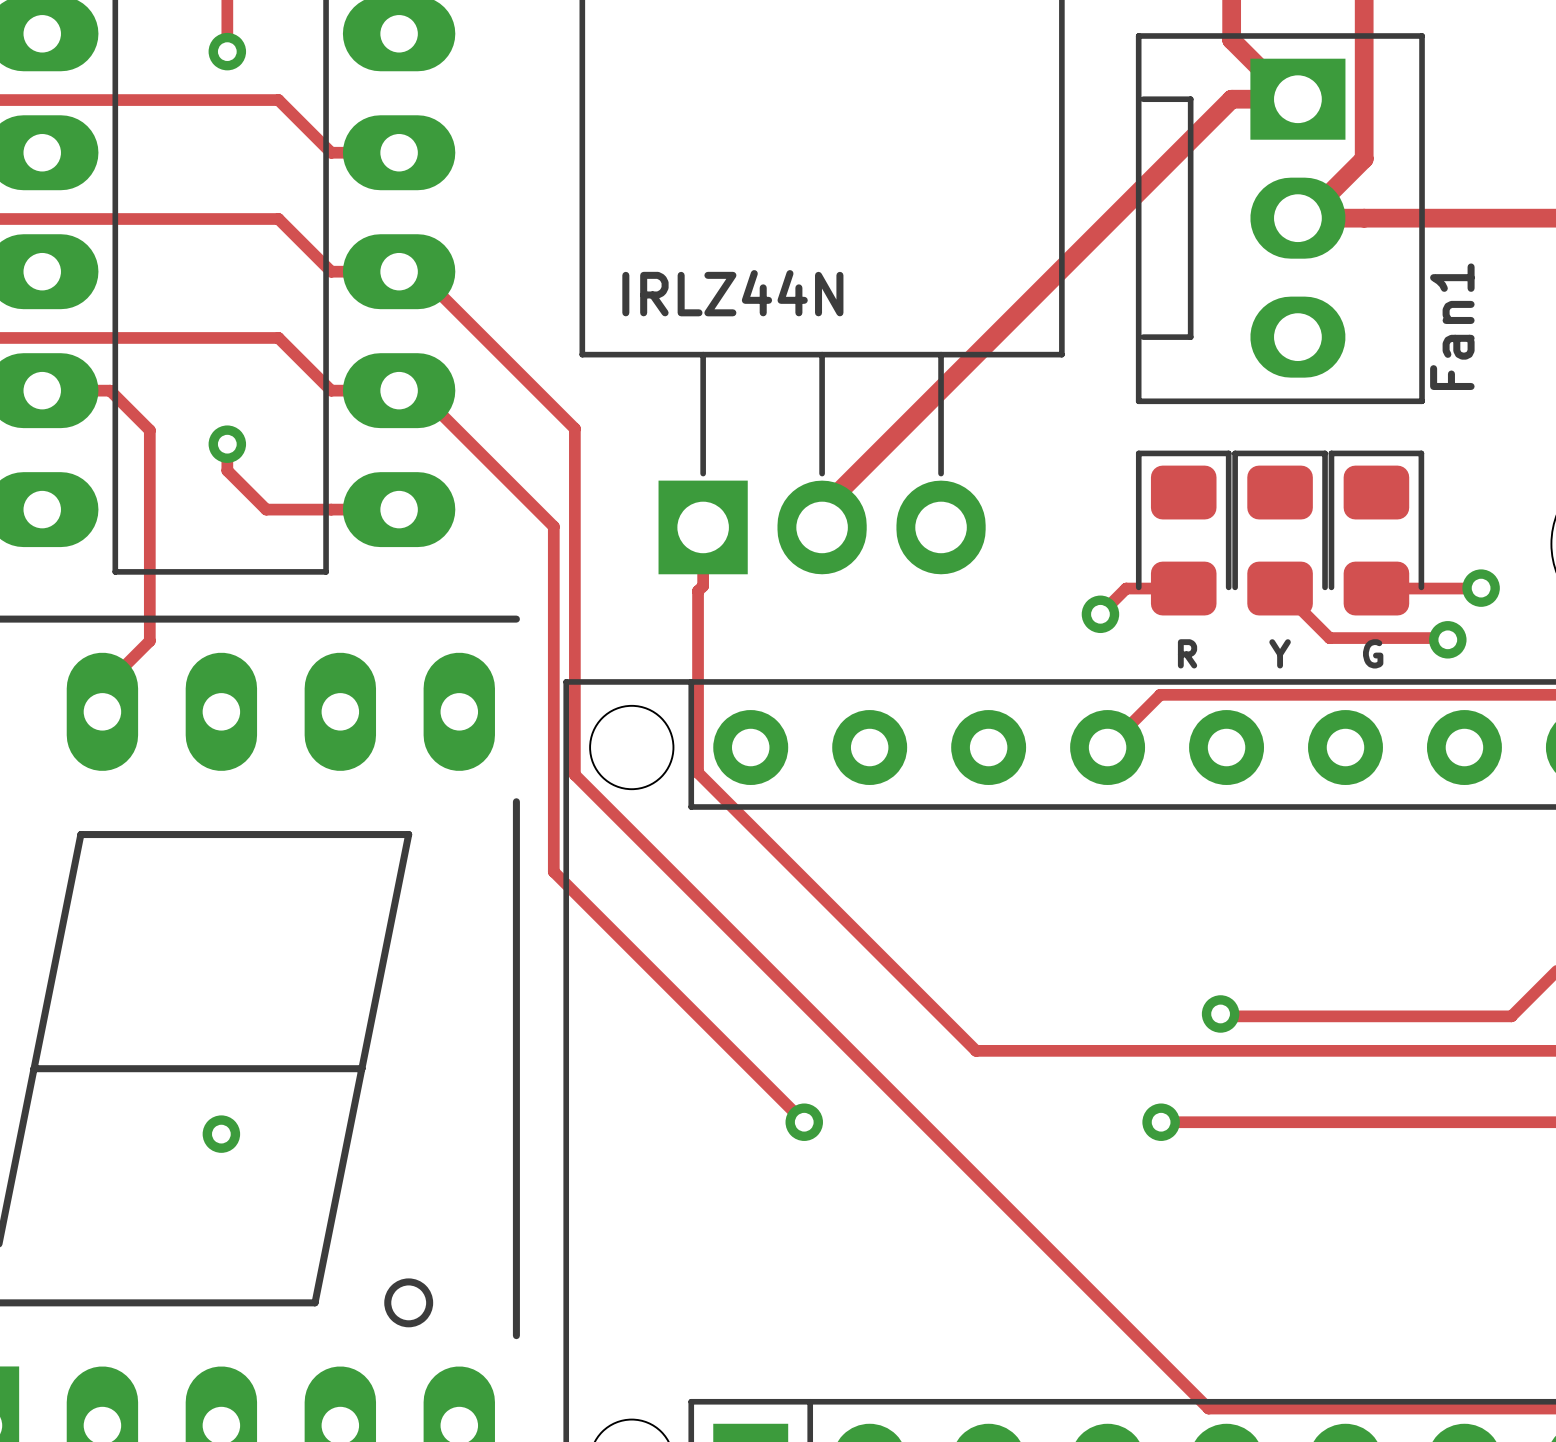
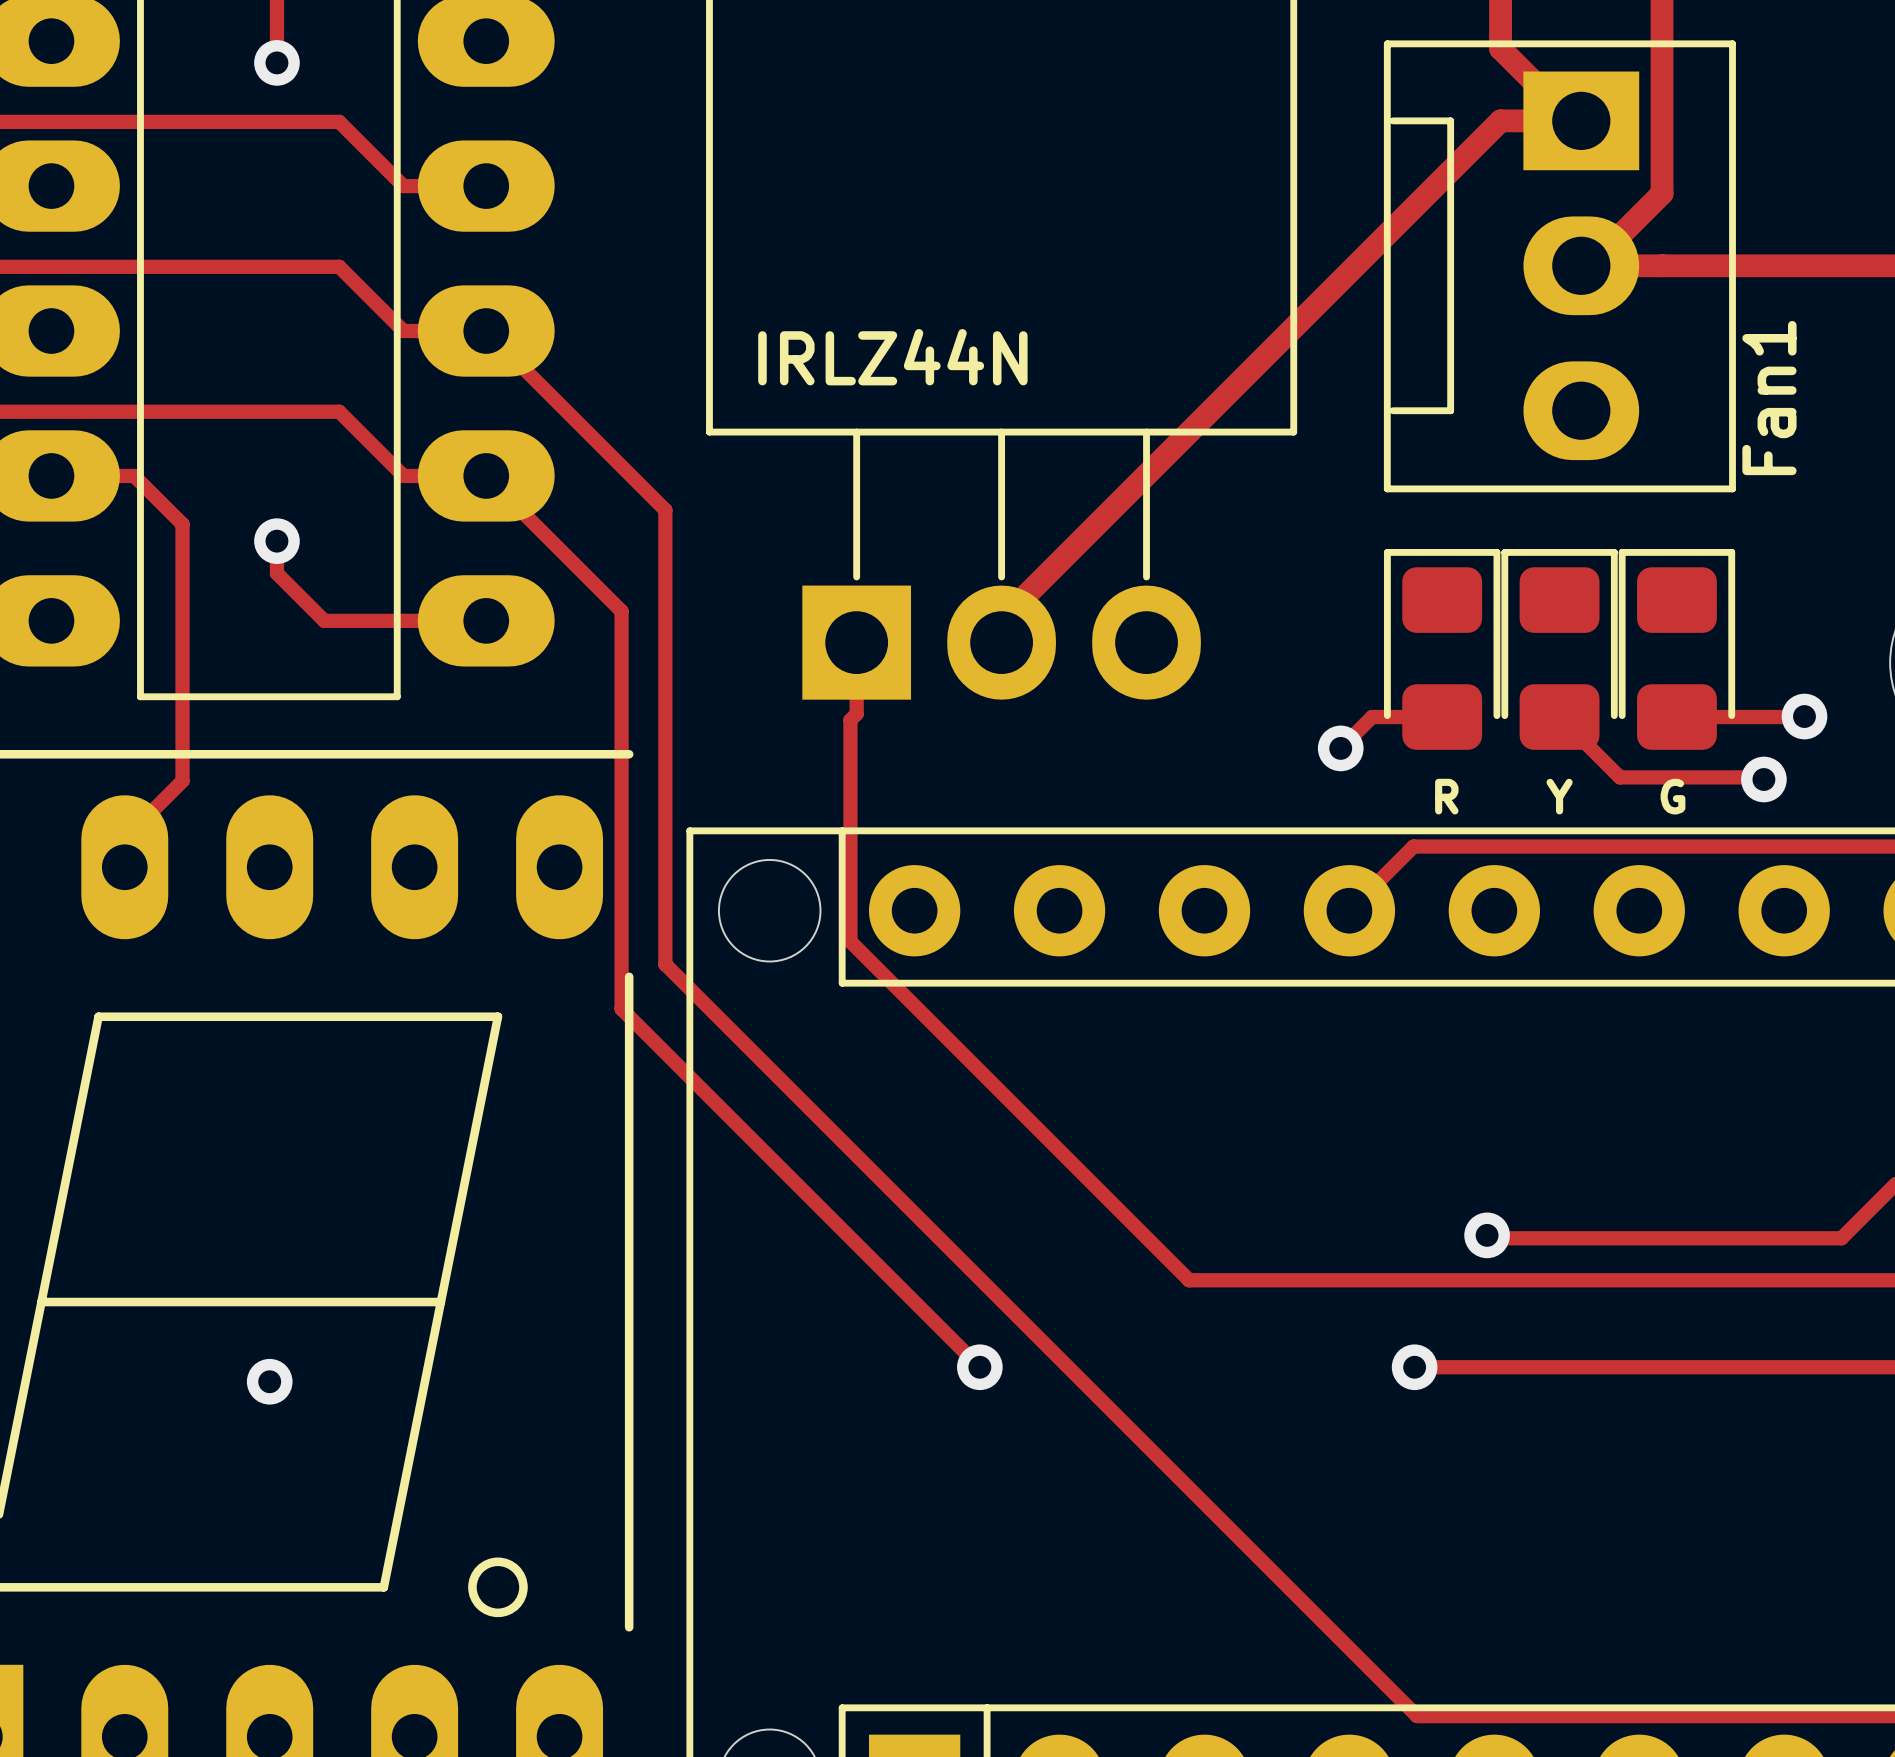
track: (417, 271) (574, 428) (574, 774) (1208, 1408) -> (486, 331) (665, 510) (665, 964) (1417, 1716) (1472, 1716)
track: (417, 390) (553, 526) (553, 871) -> (486, 475) (621, 611) (621, 1008) (674, 1062)

